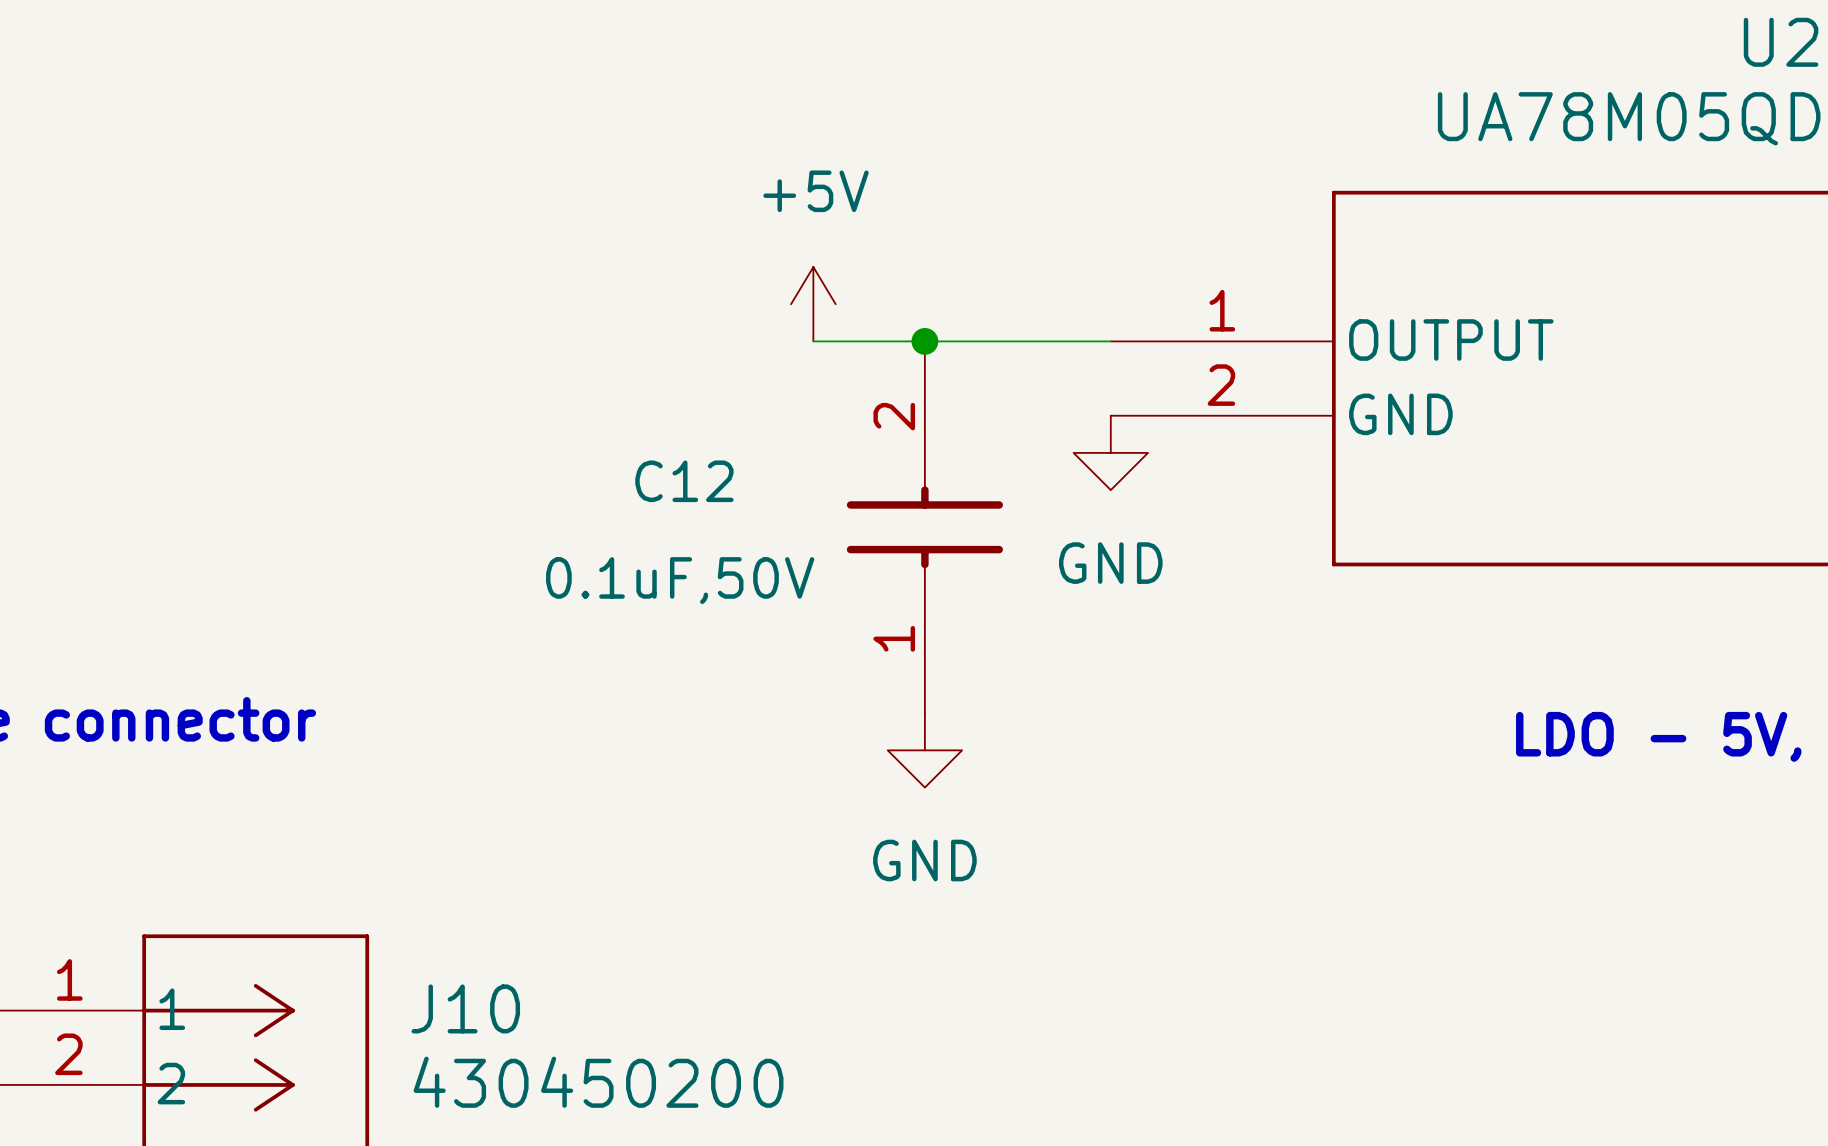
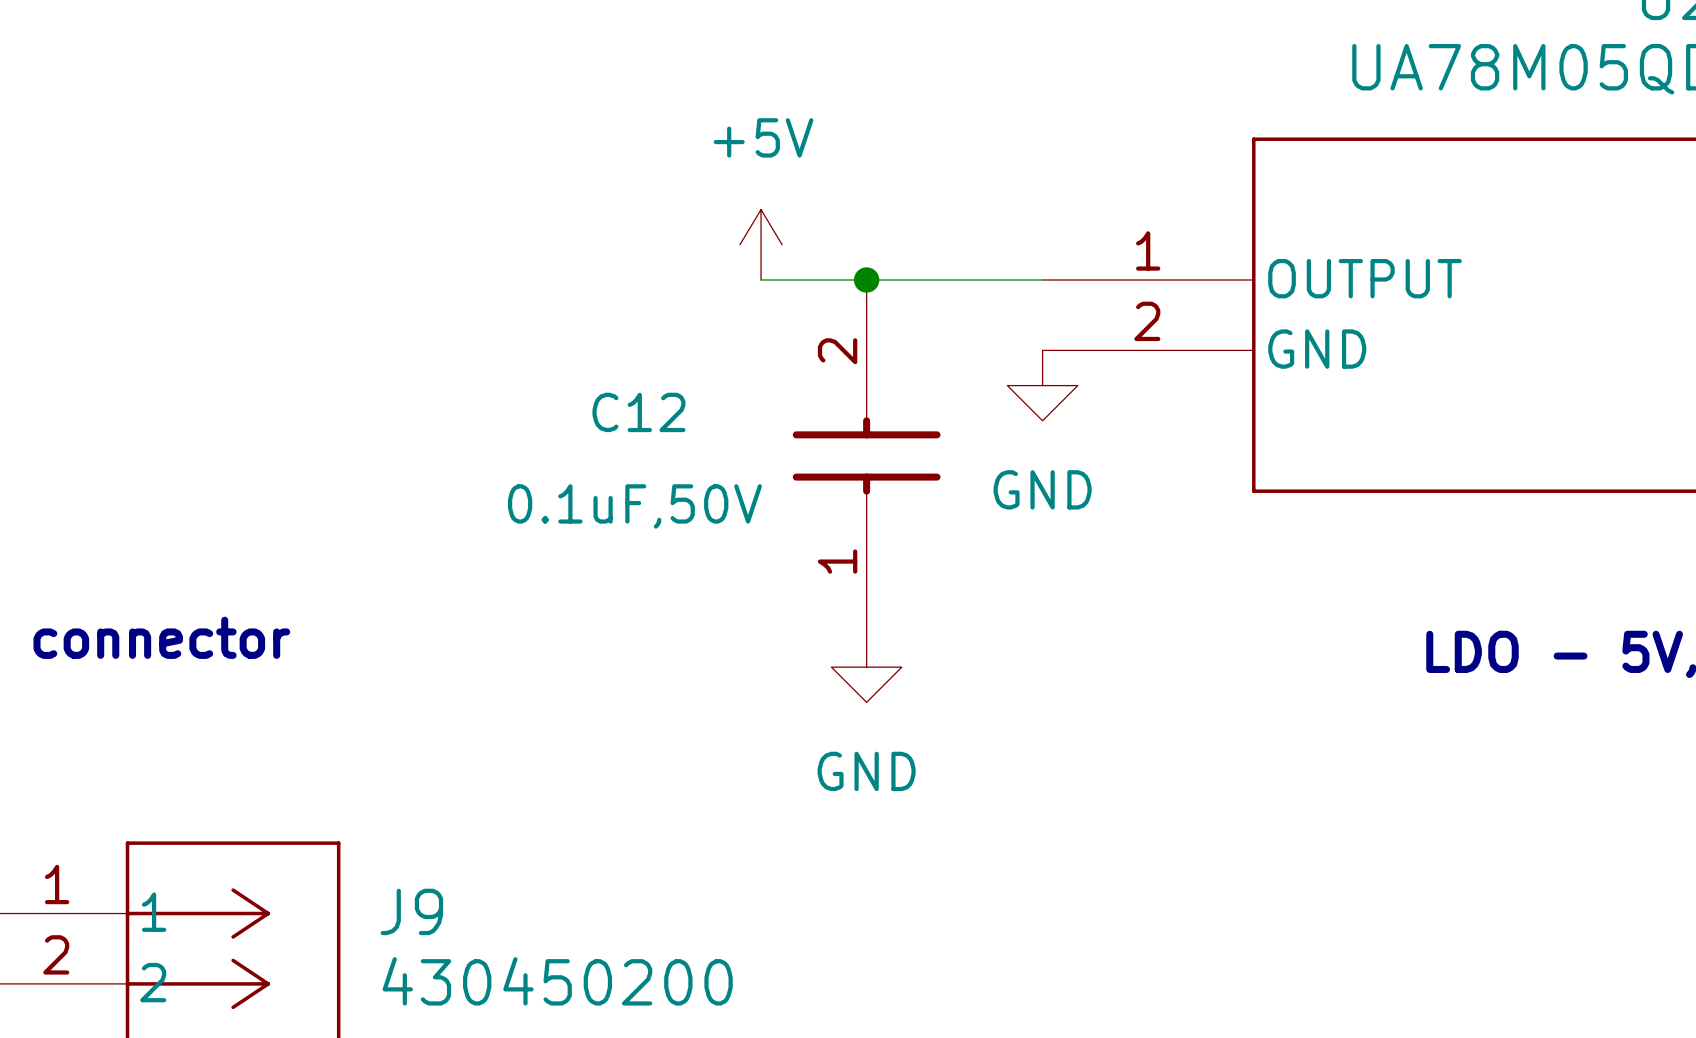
J10 name: J10 (465, 1008) -> J9 (411, 911)

